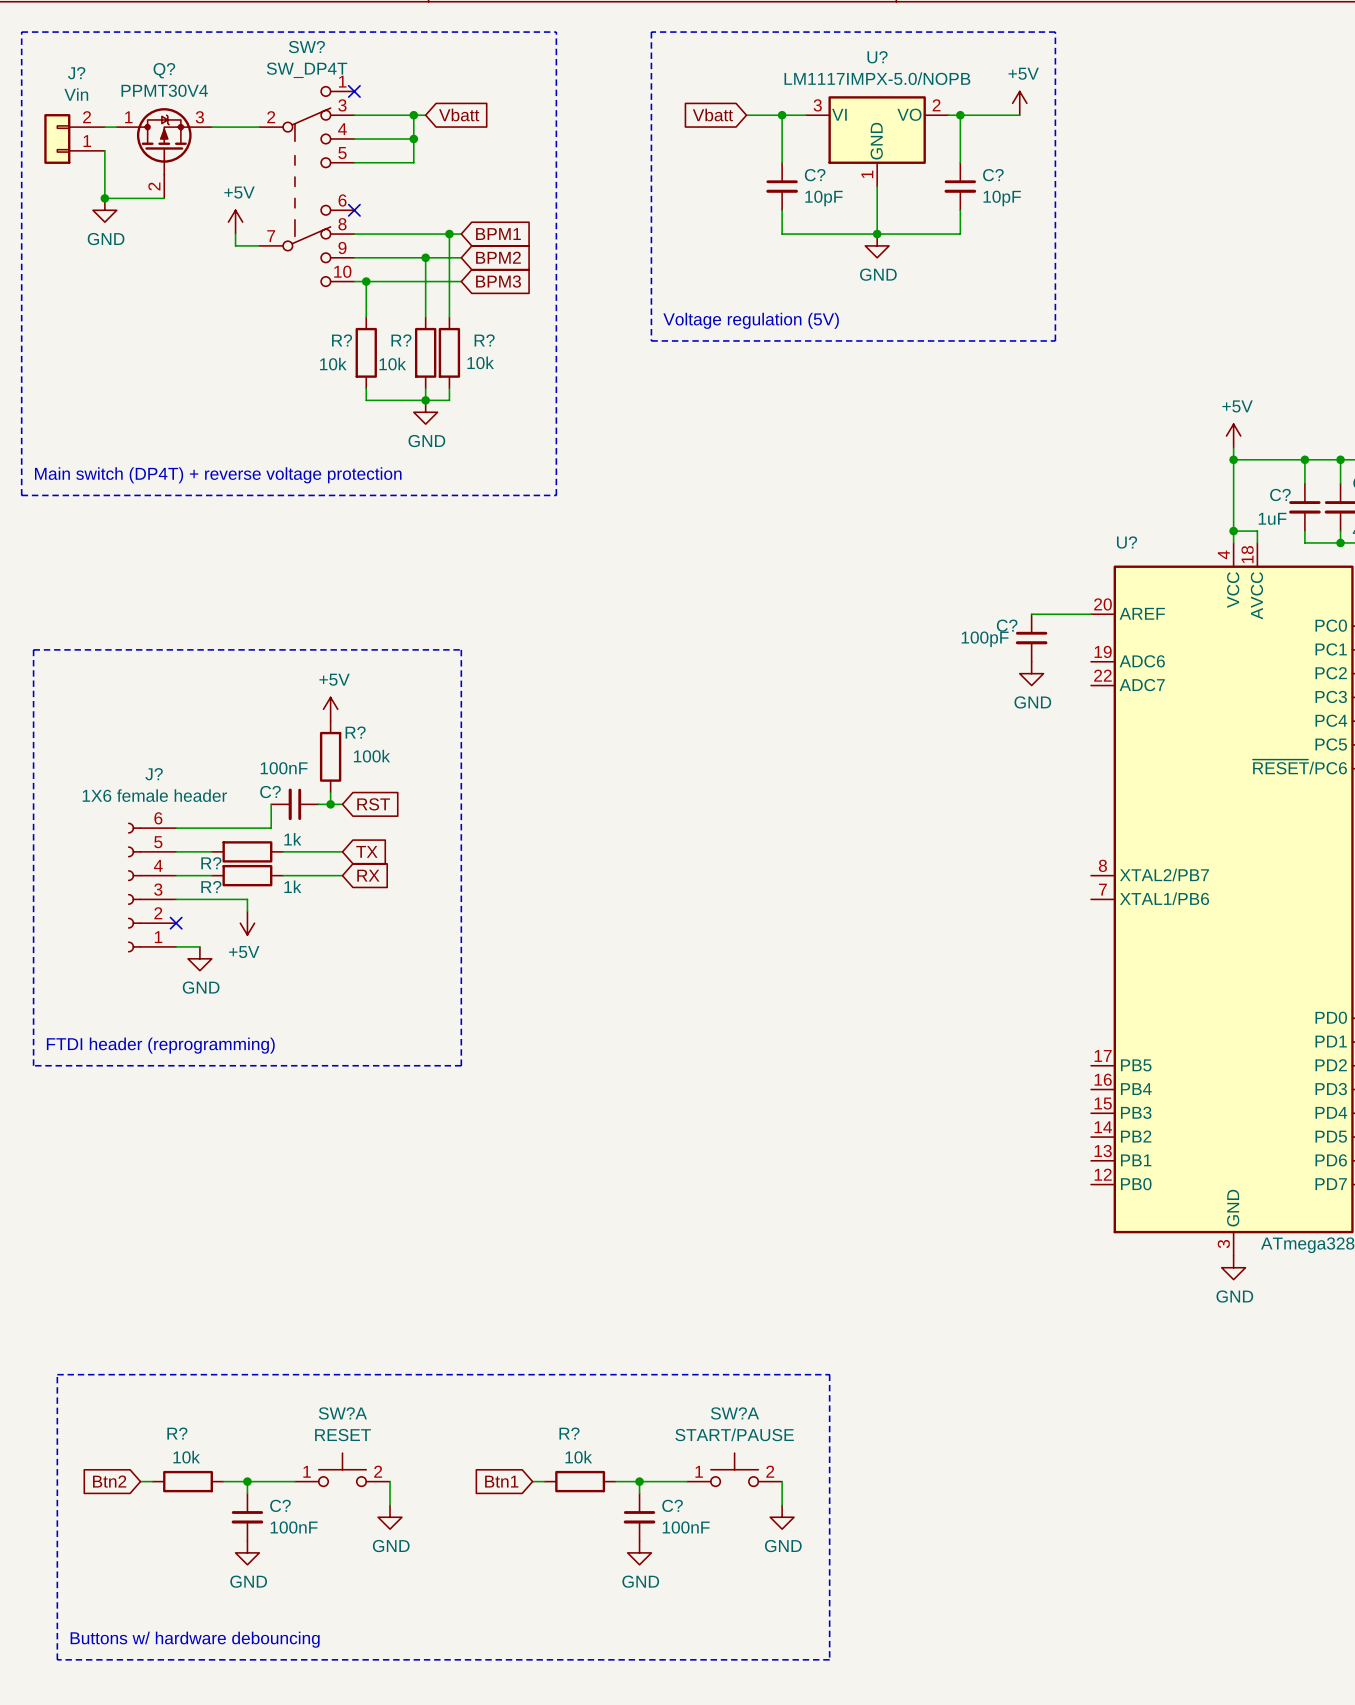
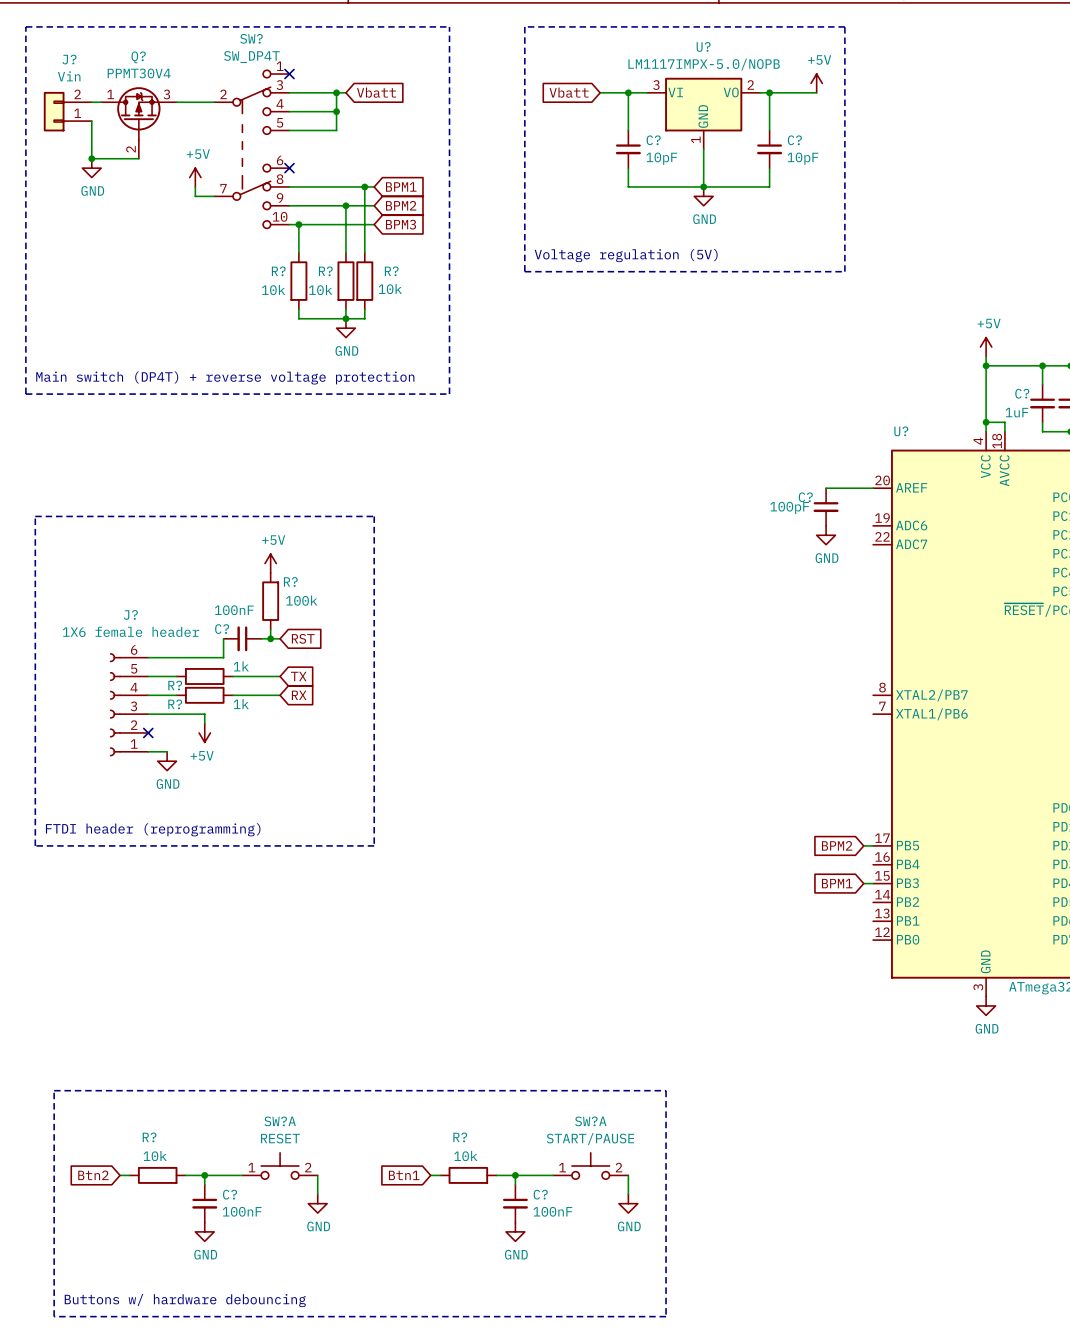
global label: none -> BPM2 (837, 845)
wire: none -> (863, 845) (873, 845)
global label: none -> BPM1 (837, 883)
wire: none -> (863, 883) (873, 883)

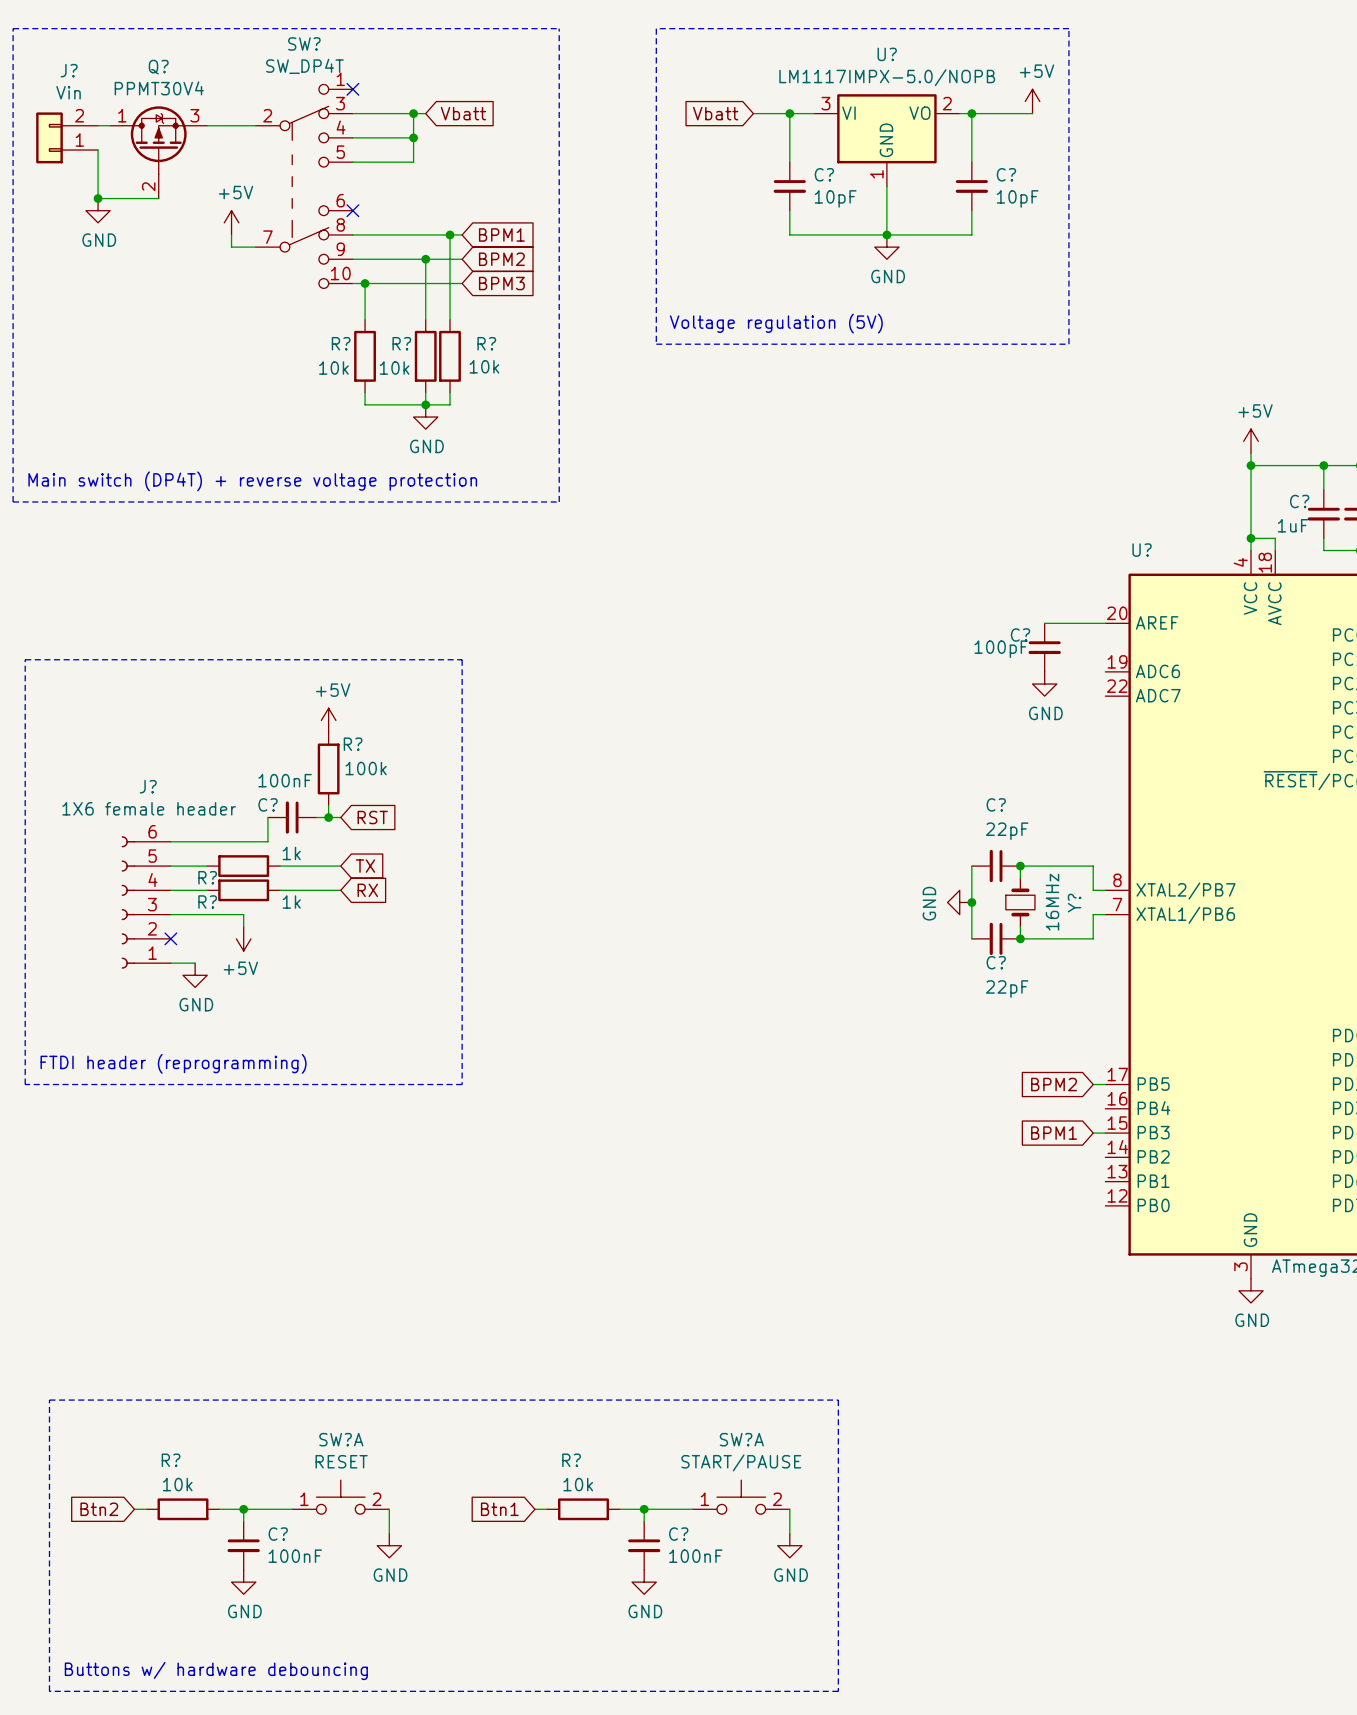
wire: none -> (971, 866) (971, 938)
C?: none -> 22pF (996, 866)
junction: none -> (1020, 866)
wire: none -> (1020, 878) (1020, 866) (1093, 866) (1093, 890) (1105, 890)
power symbol: none -> GND (959, 902)
junction: none -> (971, 902)
Y?: none -> 16MHz (1020, 902)
wire: none -> (1105, 914) (1093, 914) (1093, 938) (1020, 938) (1020, 926)
C?: none -> 22pF (996, 938)
junction: none -> (1020, 938)

